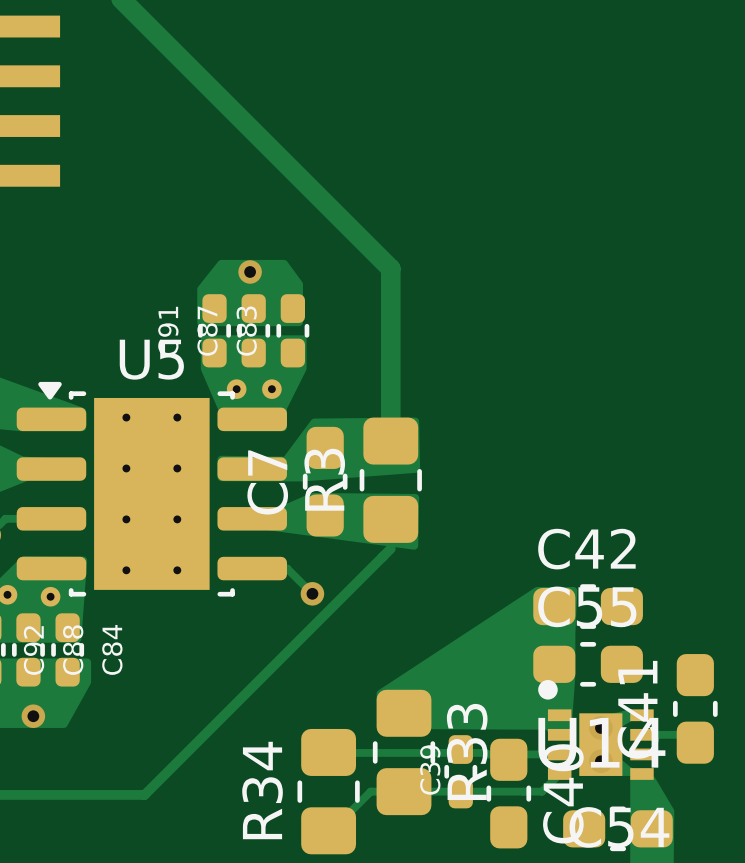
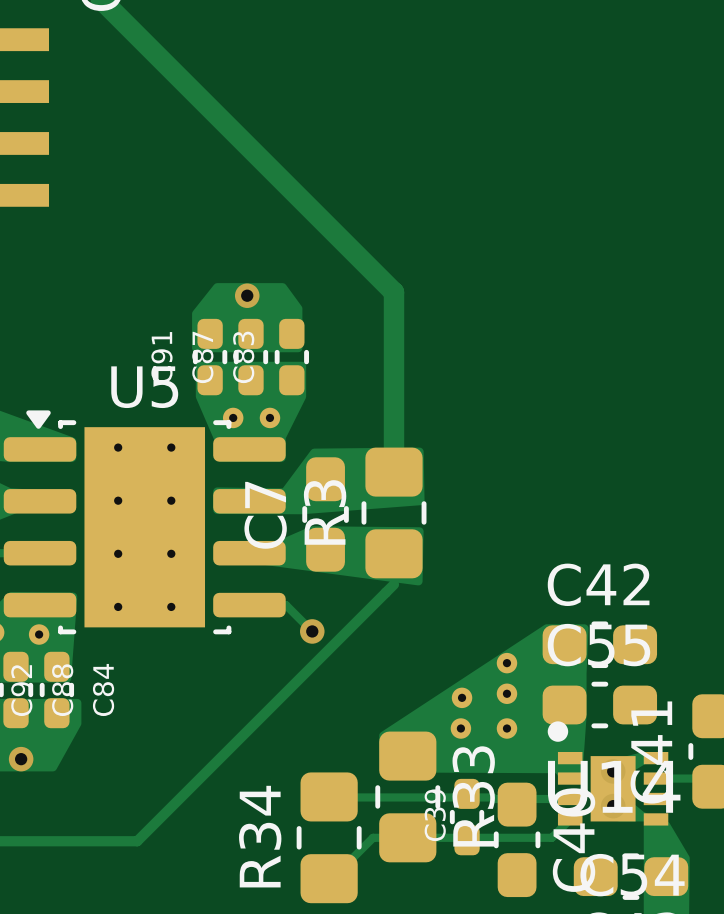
part: none -> (506, 663)
part: none -> (506, 693)
part: none -> (462, 697)
part: none -> (460, 728)
part: none -> (506, 728)

